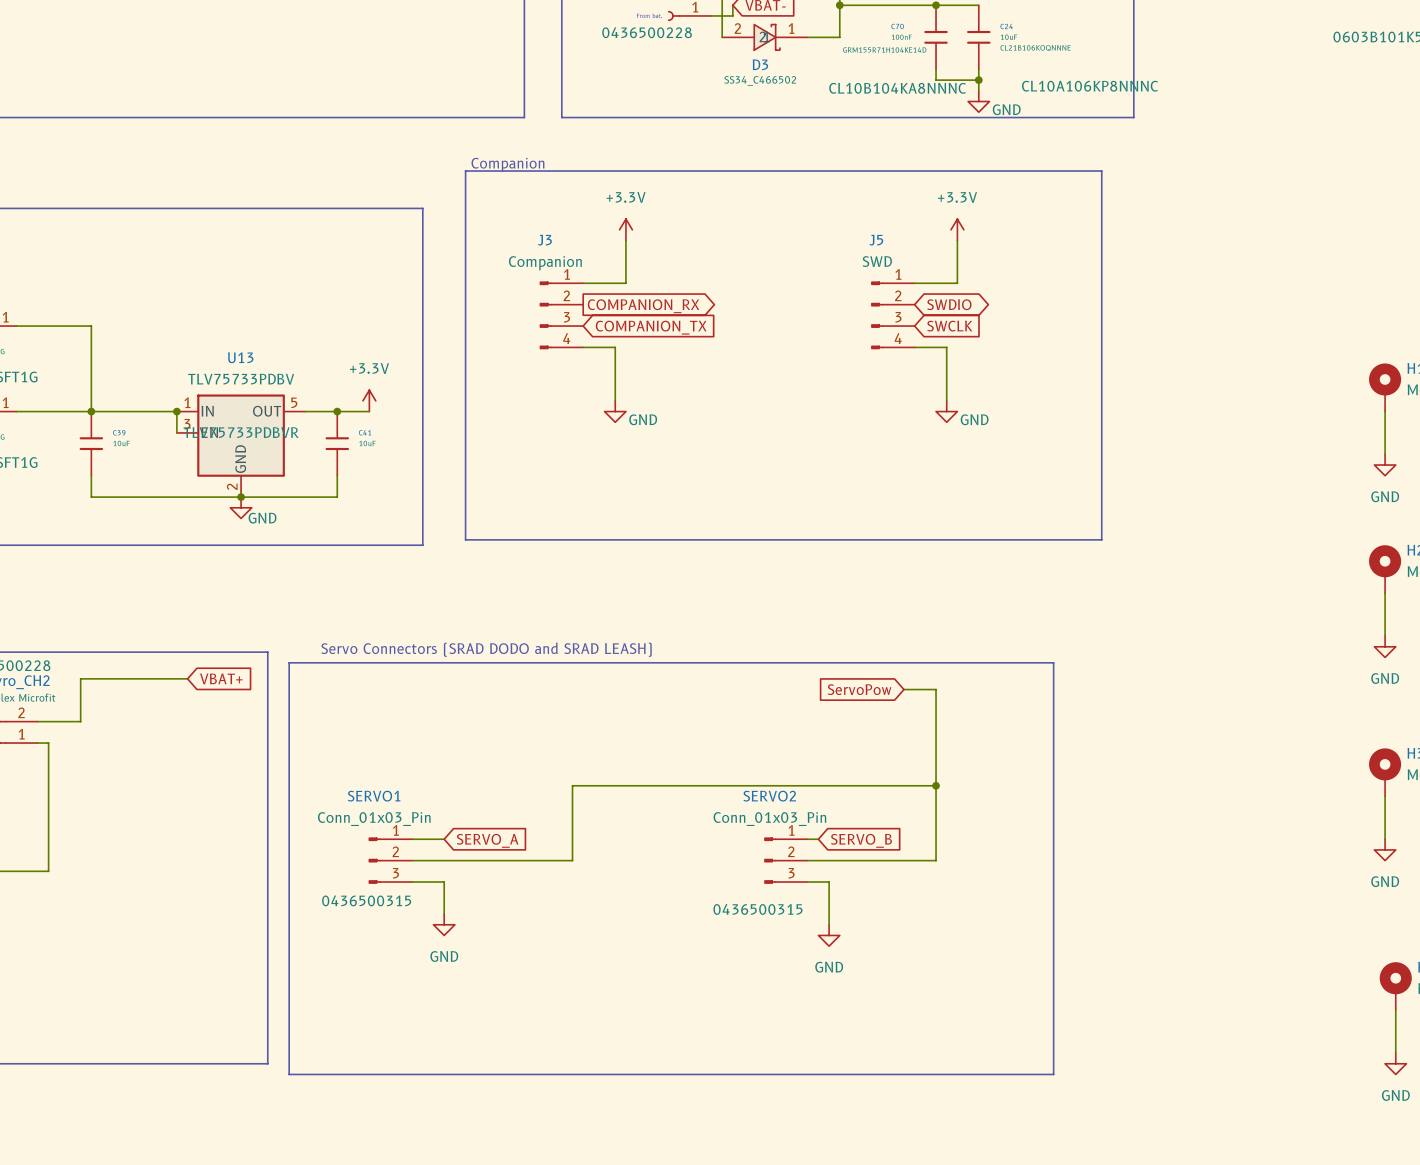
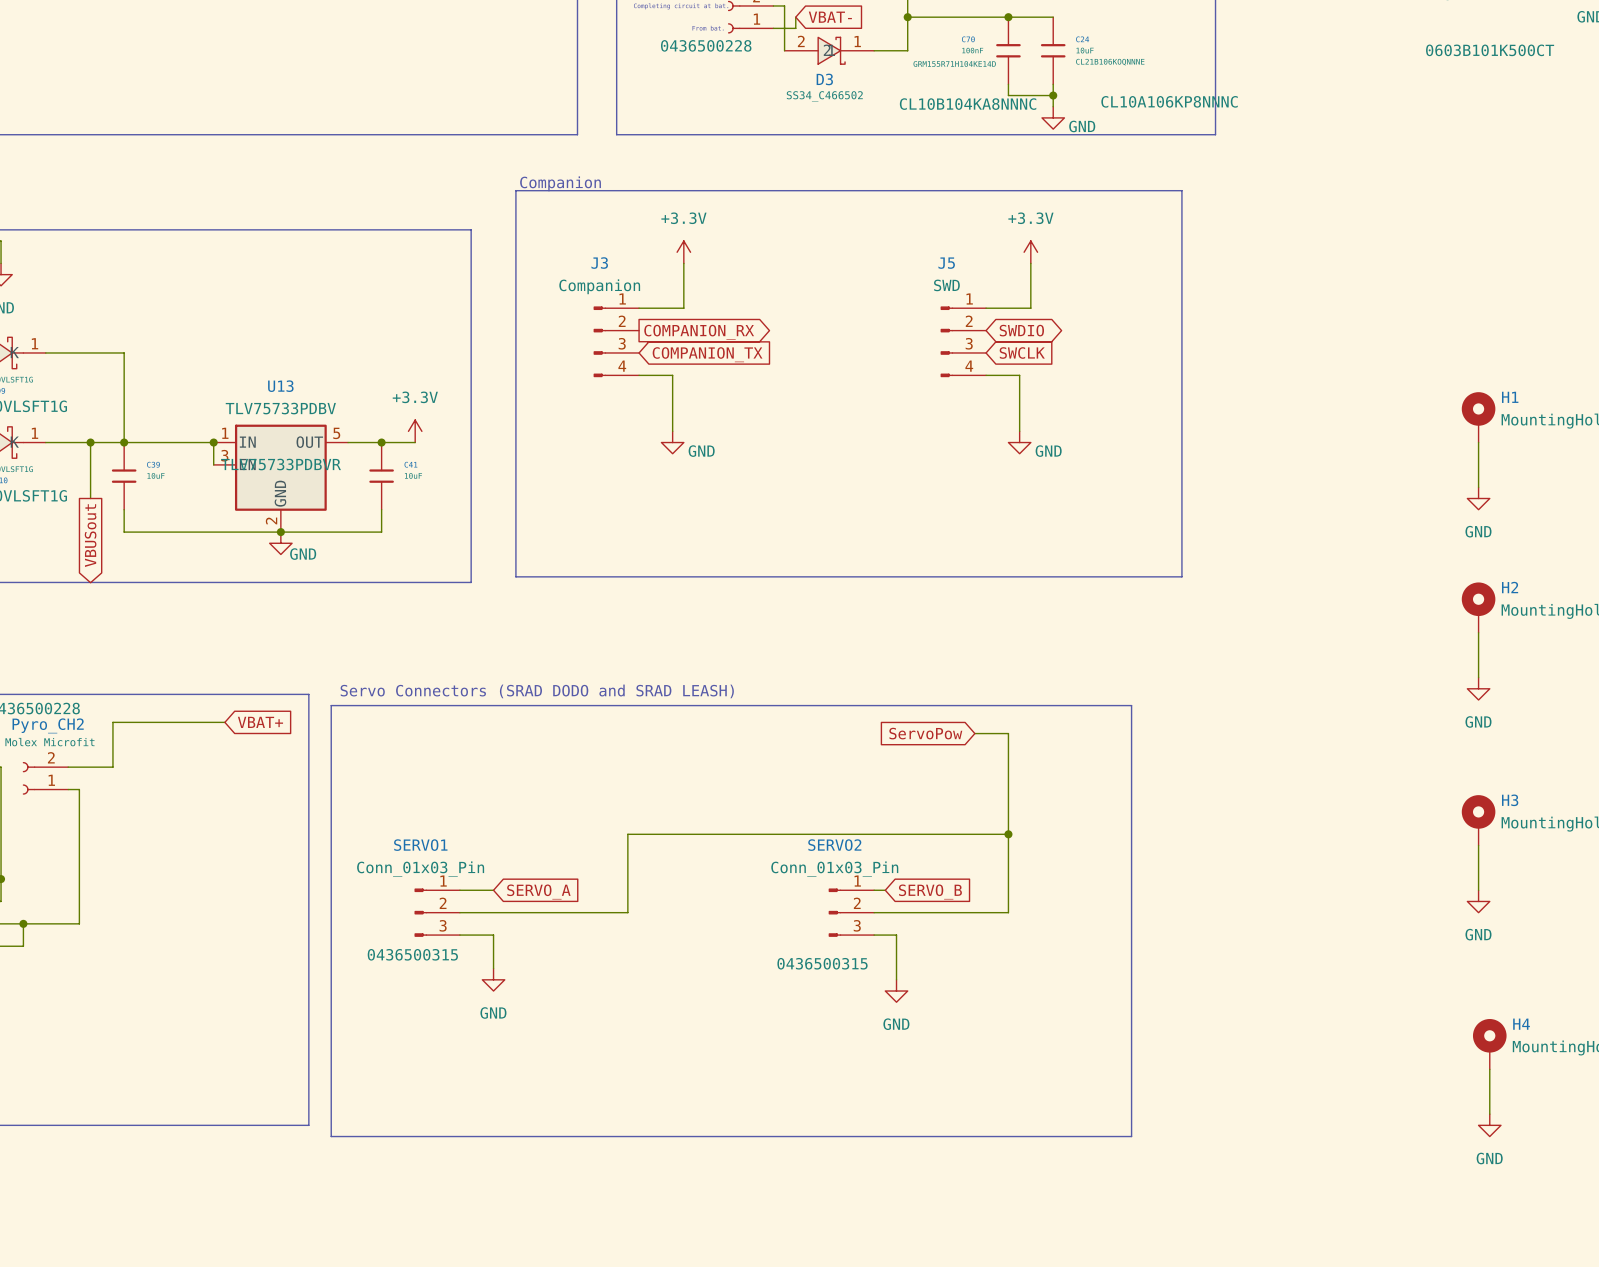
wire: none -> (90, 442) (90, 498)
junction: none -> (90, 442)
global label: none -> VBUSout (90, 535)

